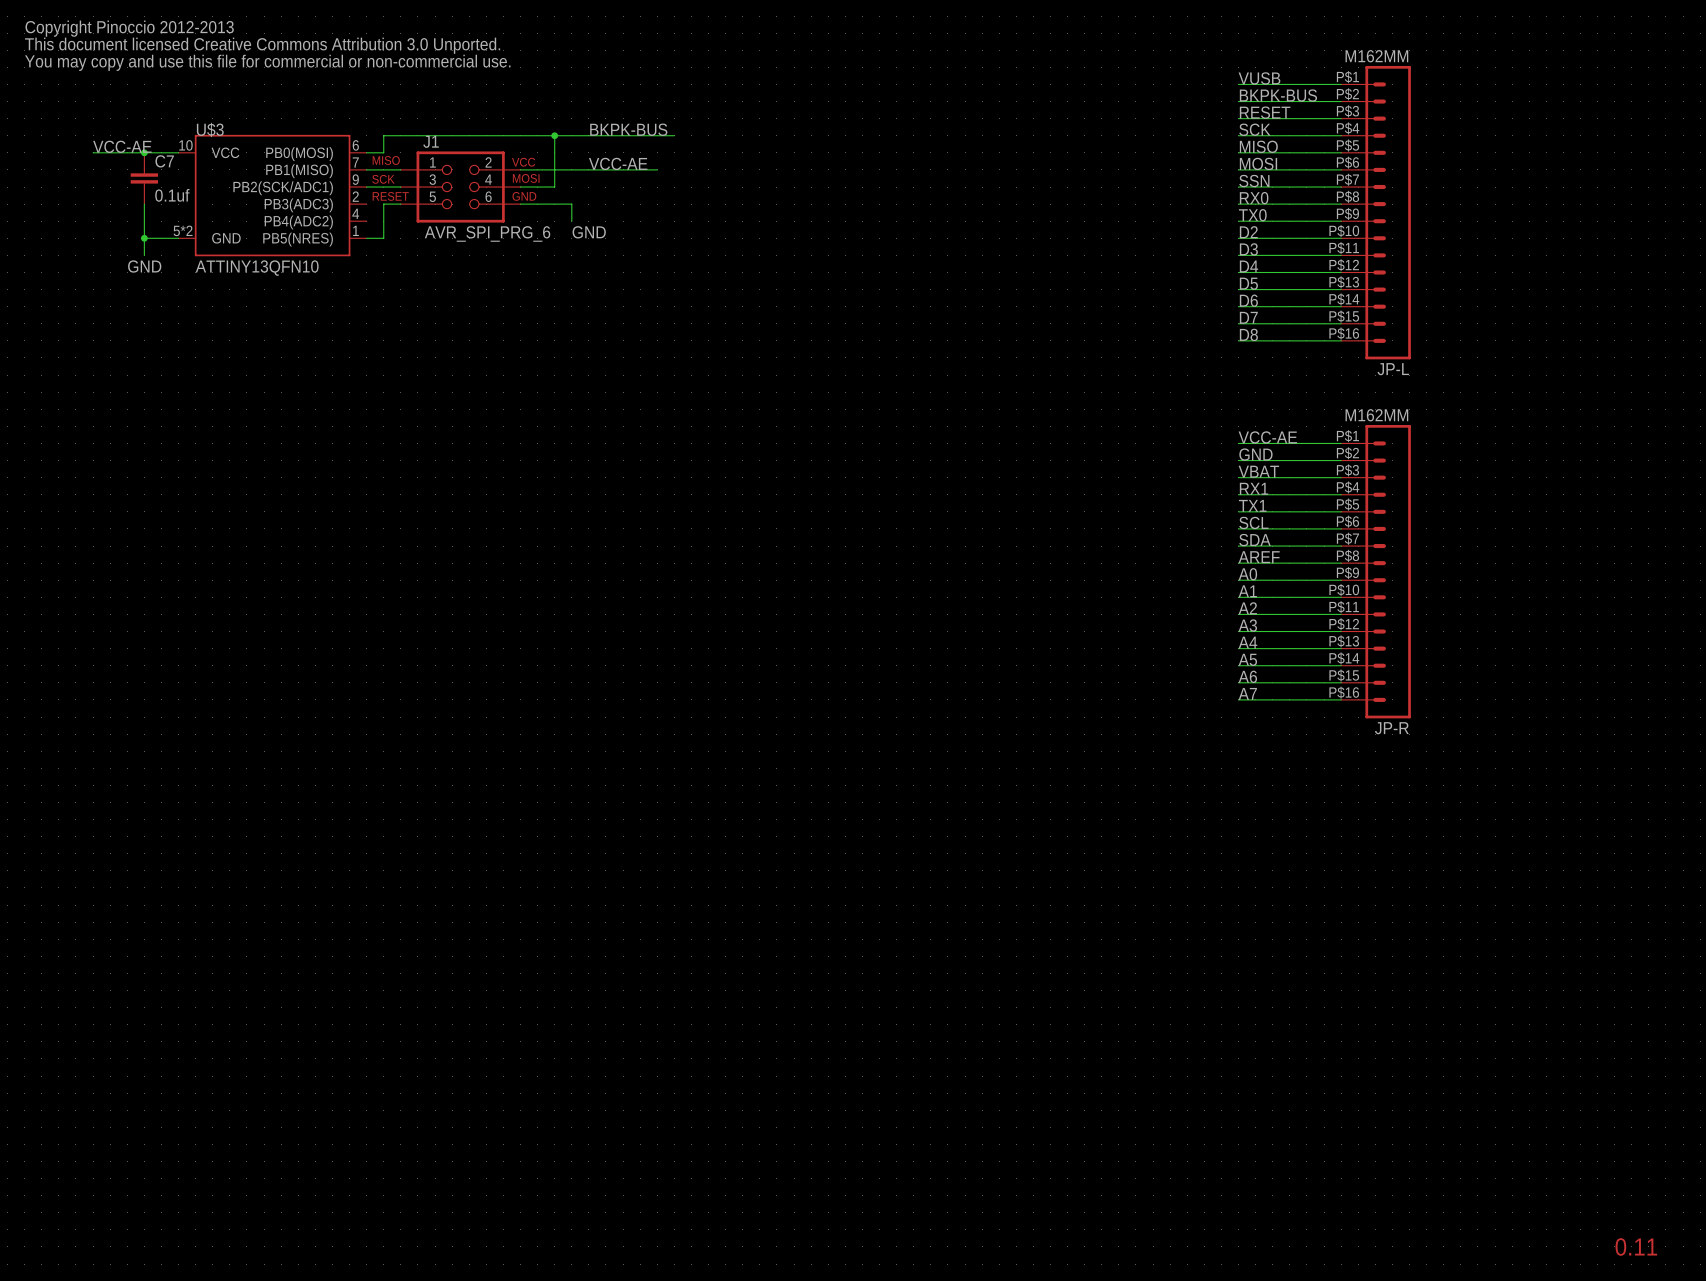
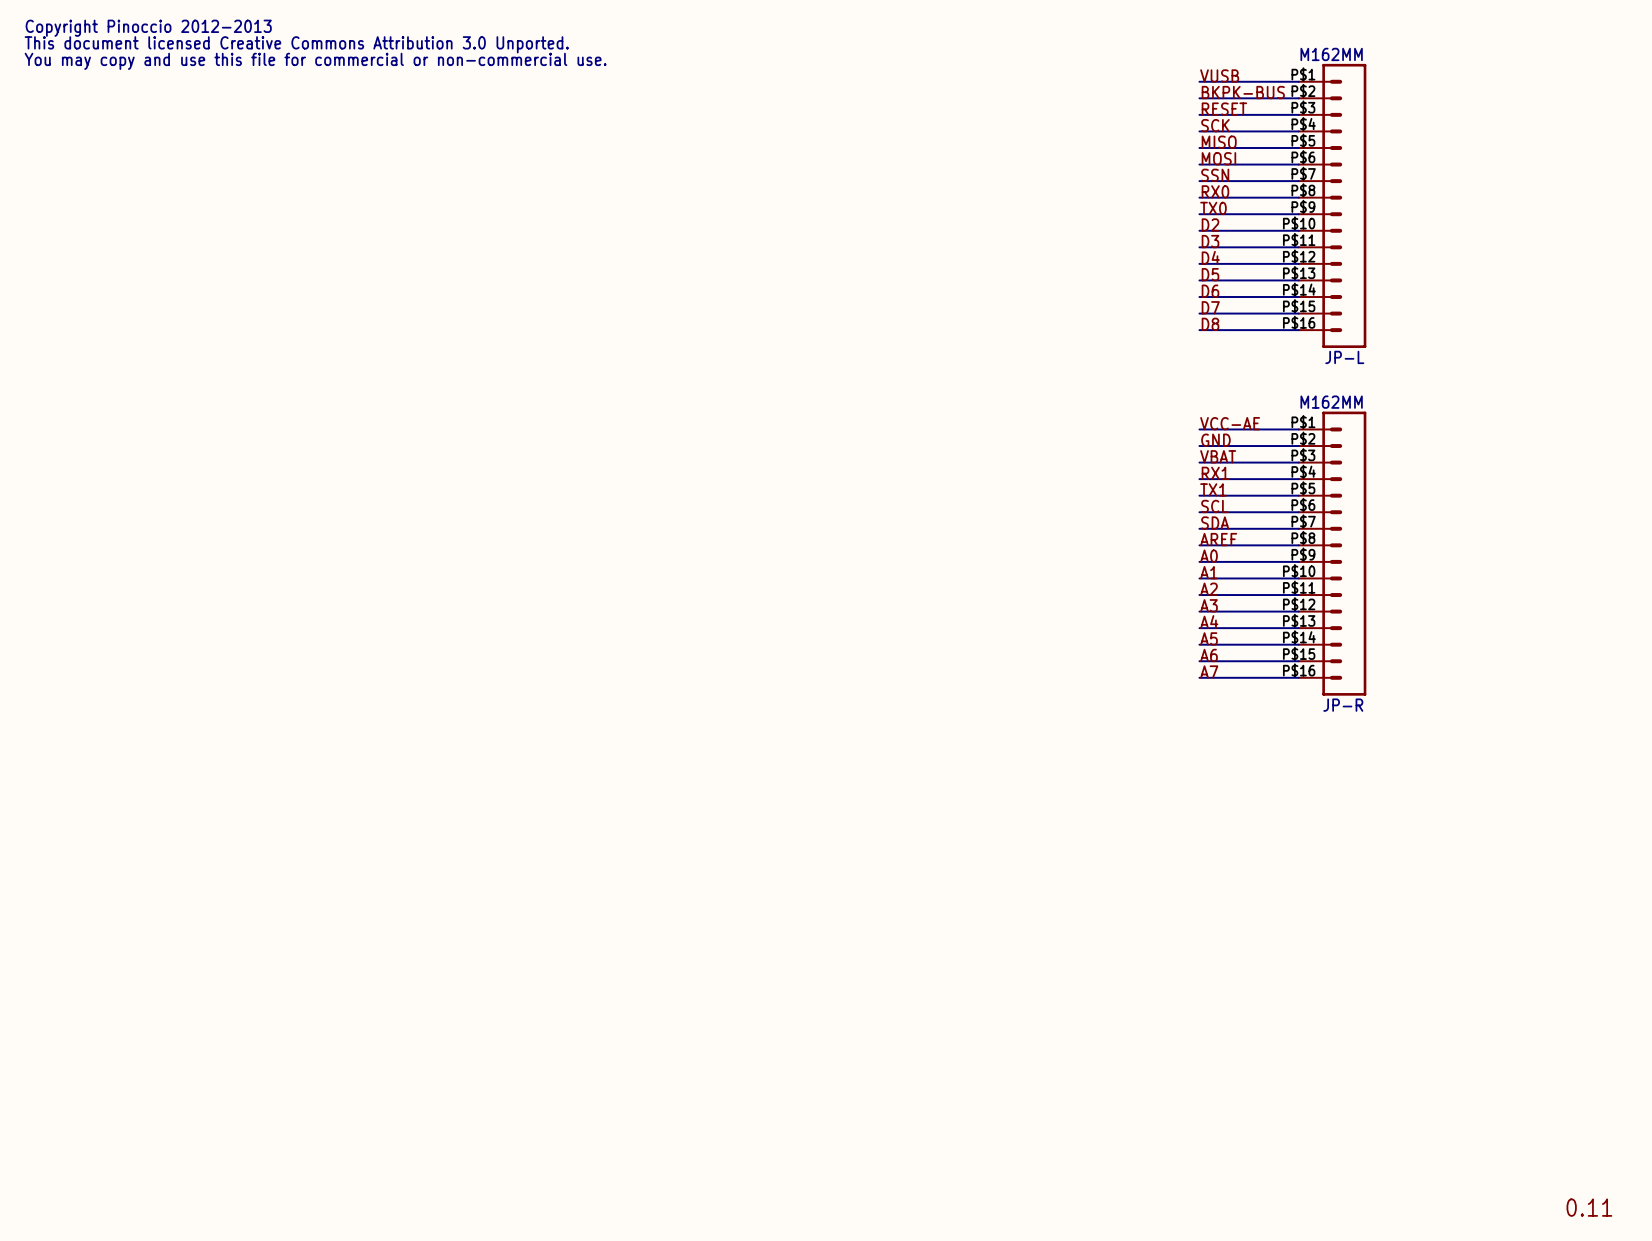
label: BKPK-BUS (628, 129) -> none
wire: (554, 135) (554, 187) (520, 187) -> none
junction: (554, 135) -> none
wire: (674, 135) (383, 135) (383, 152) (366, 152) -> none
label: VCC-AE (122, 146) -> none
wire: (93, 152) (178, 152) -> none
junction: (144, 152) -> none
label: VCC-AE (618, 163) -> none
wire: (366, 169) (400, 169) -> none
wire: (520, 169) (657, 169) -> none
C7: 0.1uf (144, 178) -> none
wire: (366, 187) (400, 187) -> none
J1: AVR_SPI_PRG_6 (460, 187) -> none
U$3: ATTINY13QFN10 (272, 195) -> none
wire: (144, 204) (144, 255) -> none
wire: (400, 204) (383, 204) (383, 238) (366, 238) -> none
wire: (520, 204) (571, 204) (571, 221) -> none
label: GND (589, 232) -> none
wire: (144, 238) (178, 238) -> none
junction: (144, 238) -> none
label: GND (144, 266) -> none

